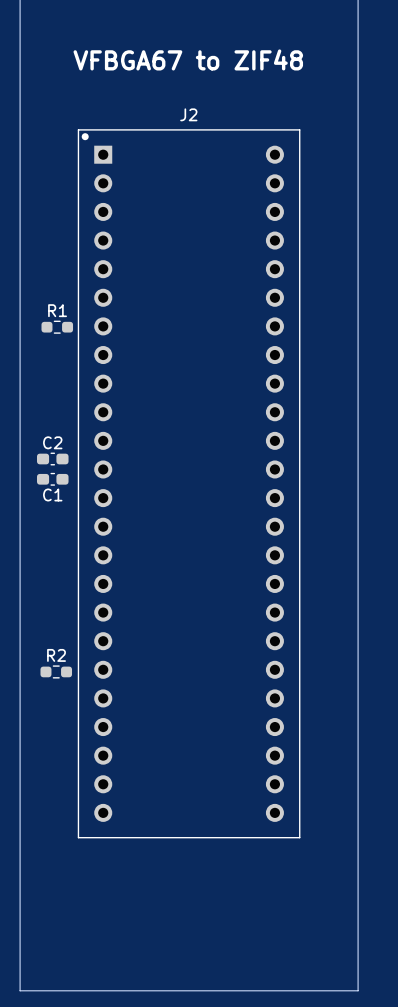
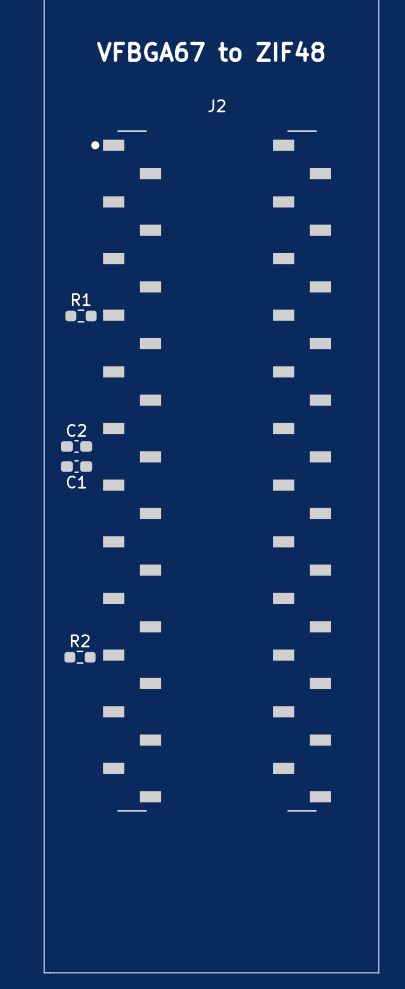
J2 footprint: [77, 129, 301, 839] -> [91, 130, 332, 812]

